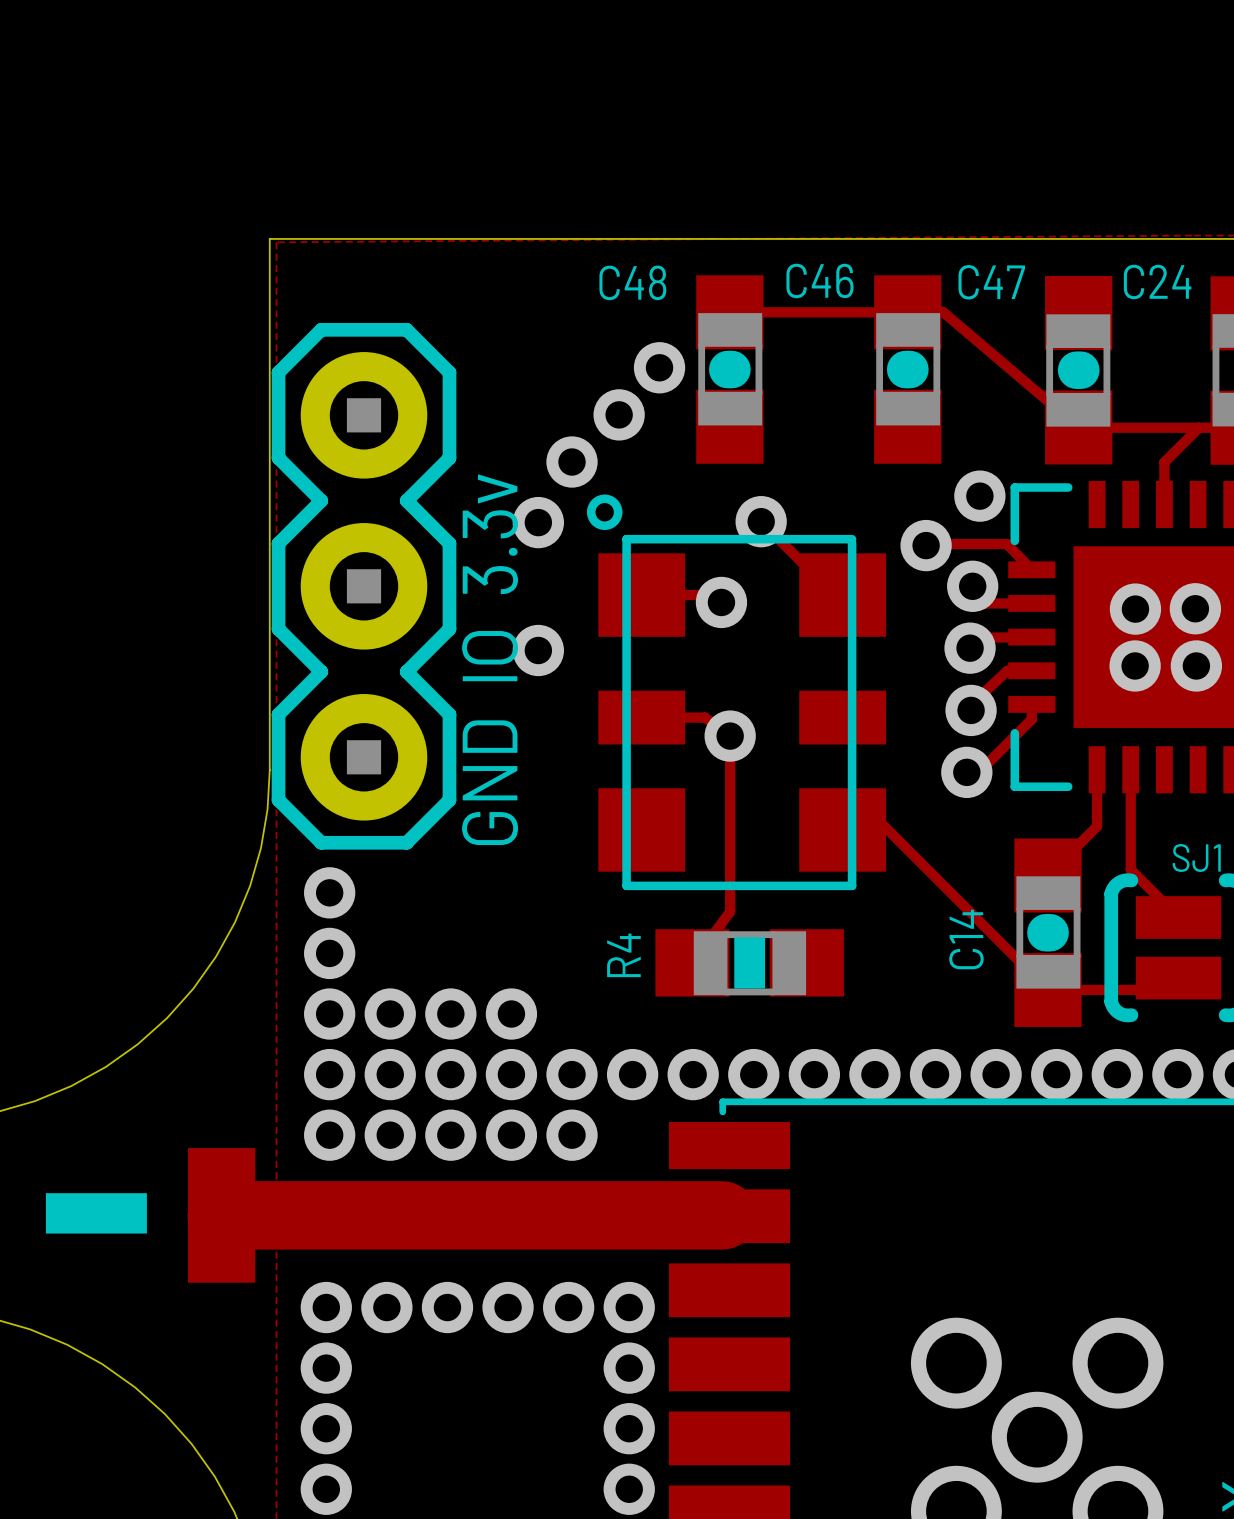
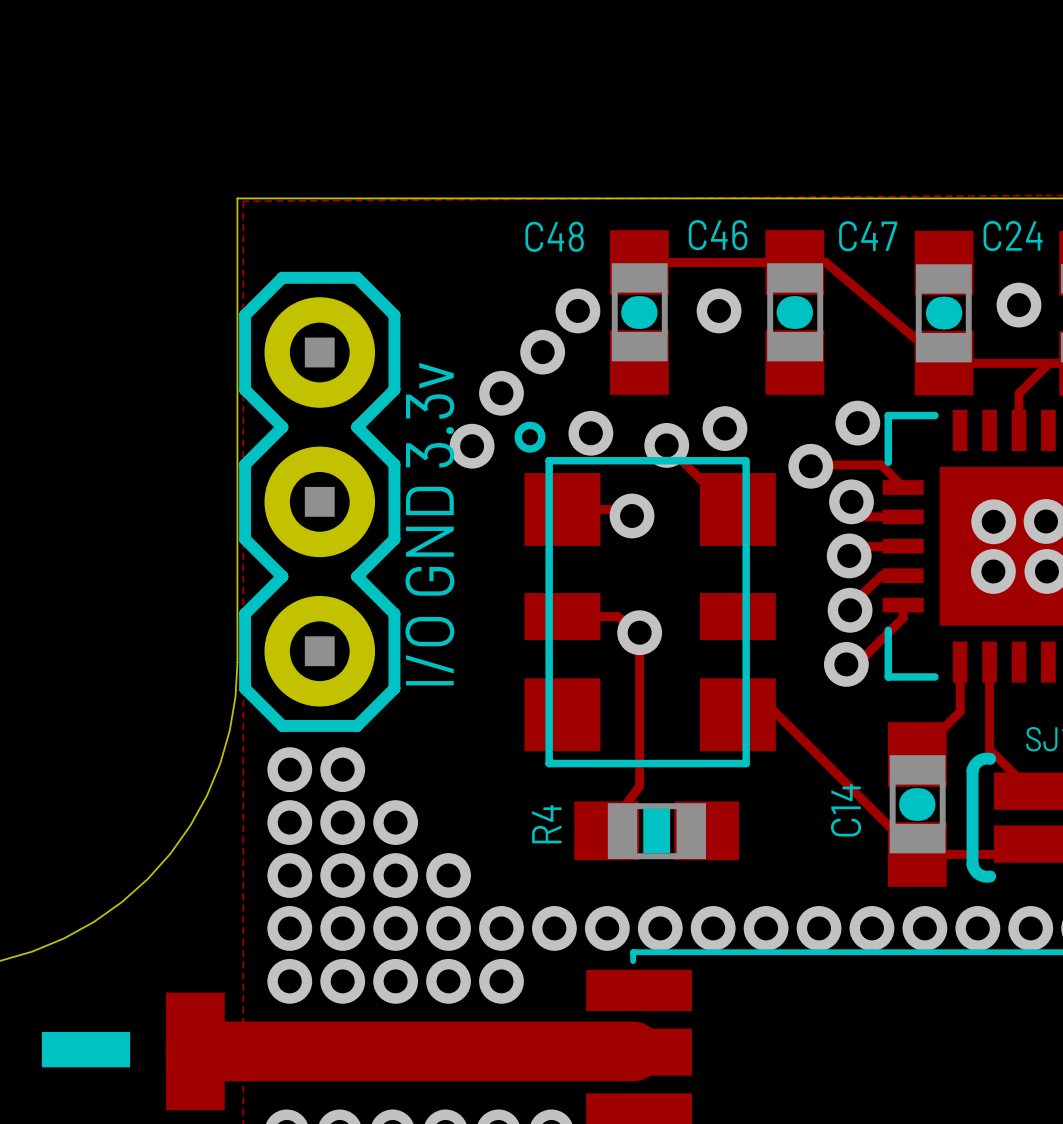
via: none -> (1018, 305)
via: none -> (719, 310)
via: none -> (724, 428)
via: none -> (590, 433)
via: (538, 650) -> none
text: GND IO 3.3v (490, 659) -> I/O GND 3.3v (429, 524)
via: none -> (342, 769)
via: none -> (342, 822)
via: none -> (395, 822)

